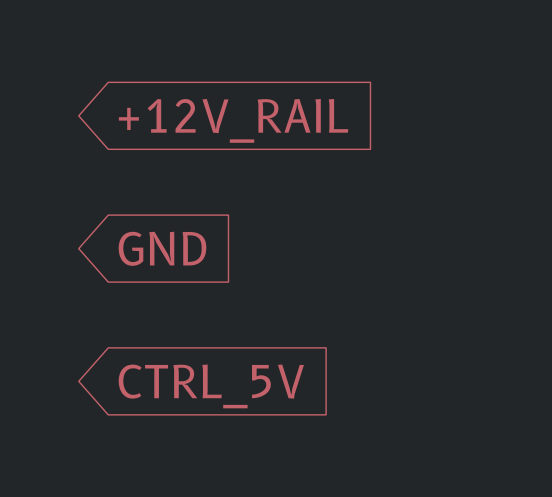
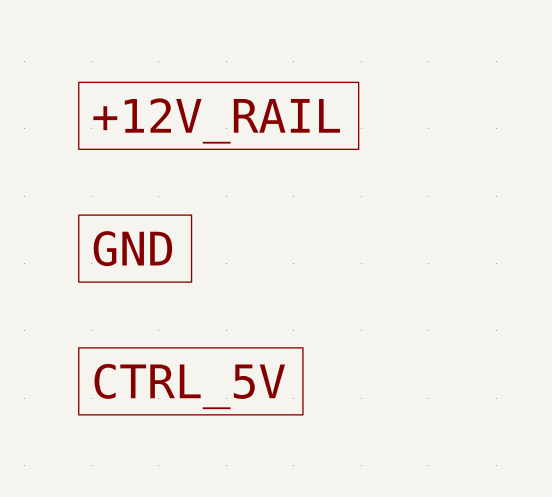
global label shape: input (233, 120) -> passive (216, 120)
global label shape: input (162, 248) -> passive (132, 248)
global label shape: input (211, 386) -> passive (189, 386)

